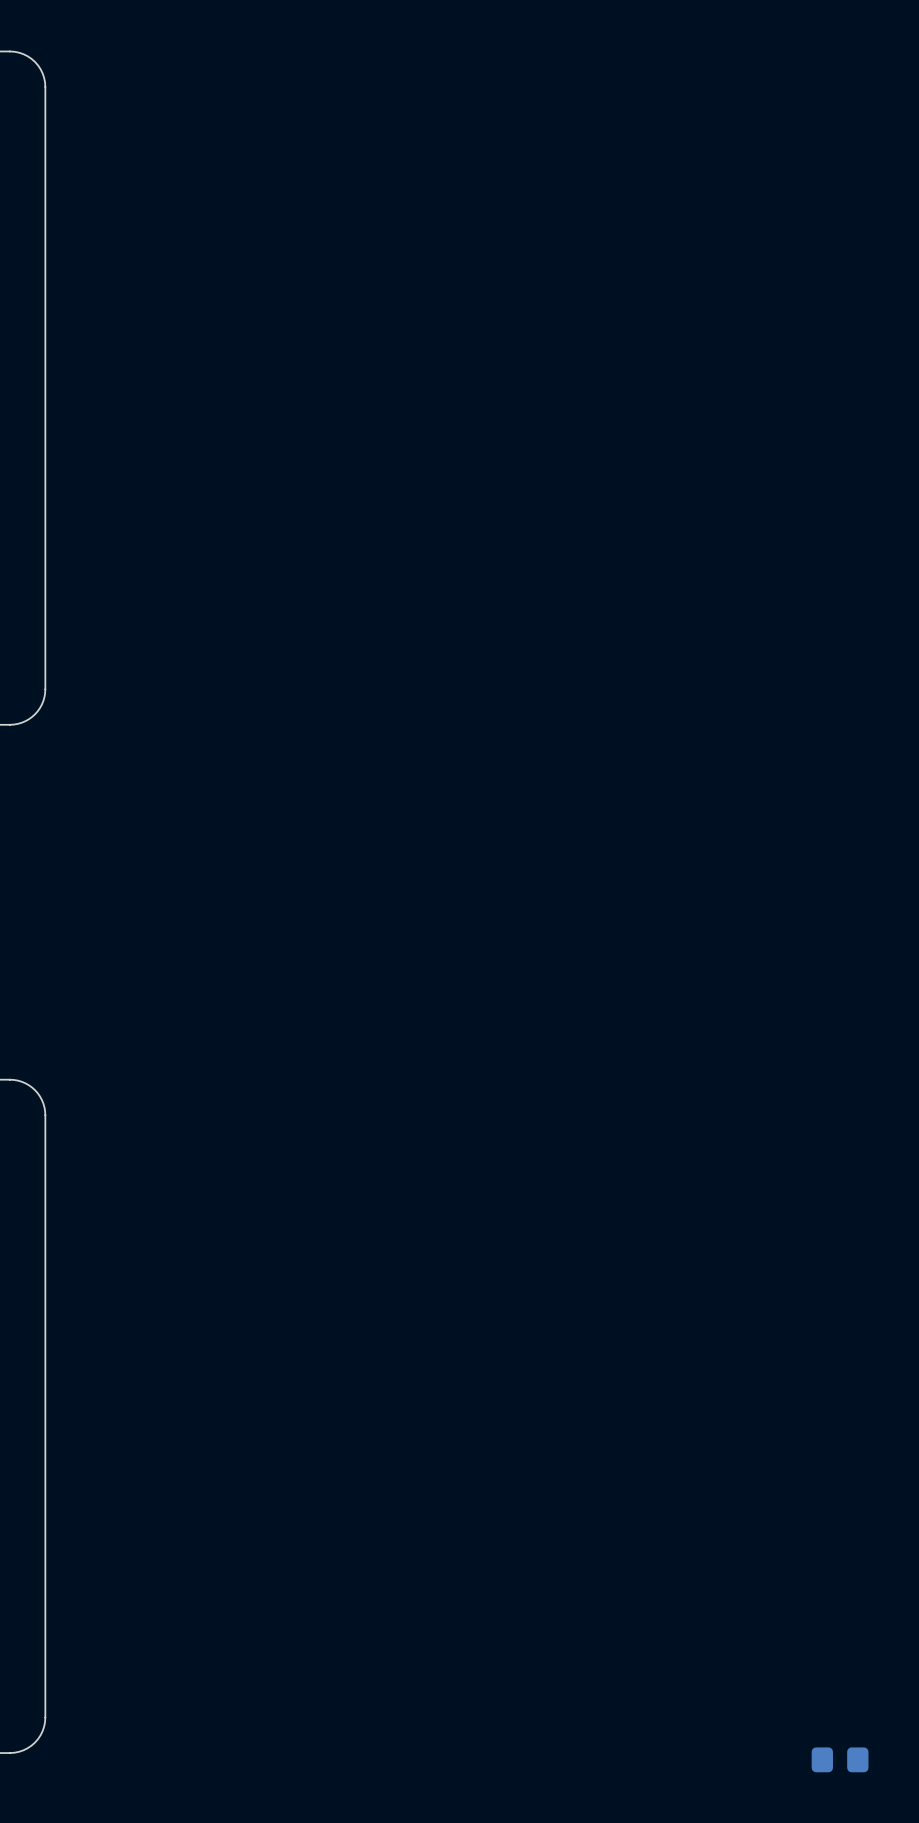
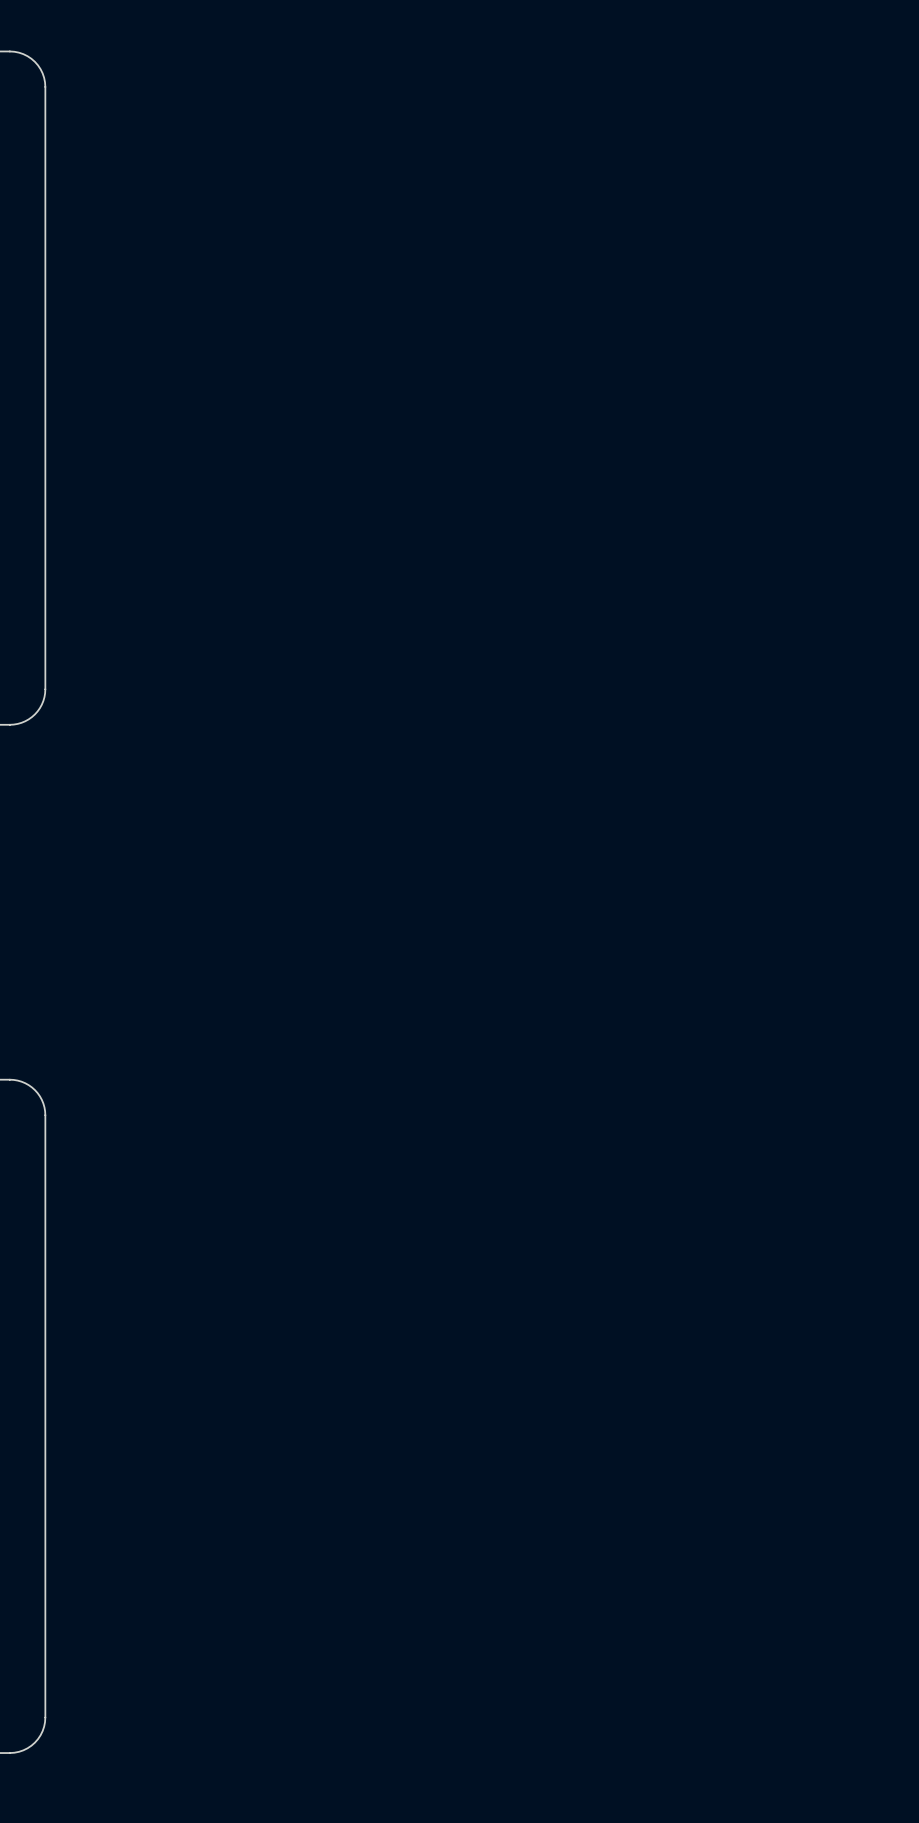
part: (840, 1759) -> none

